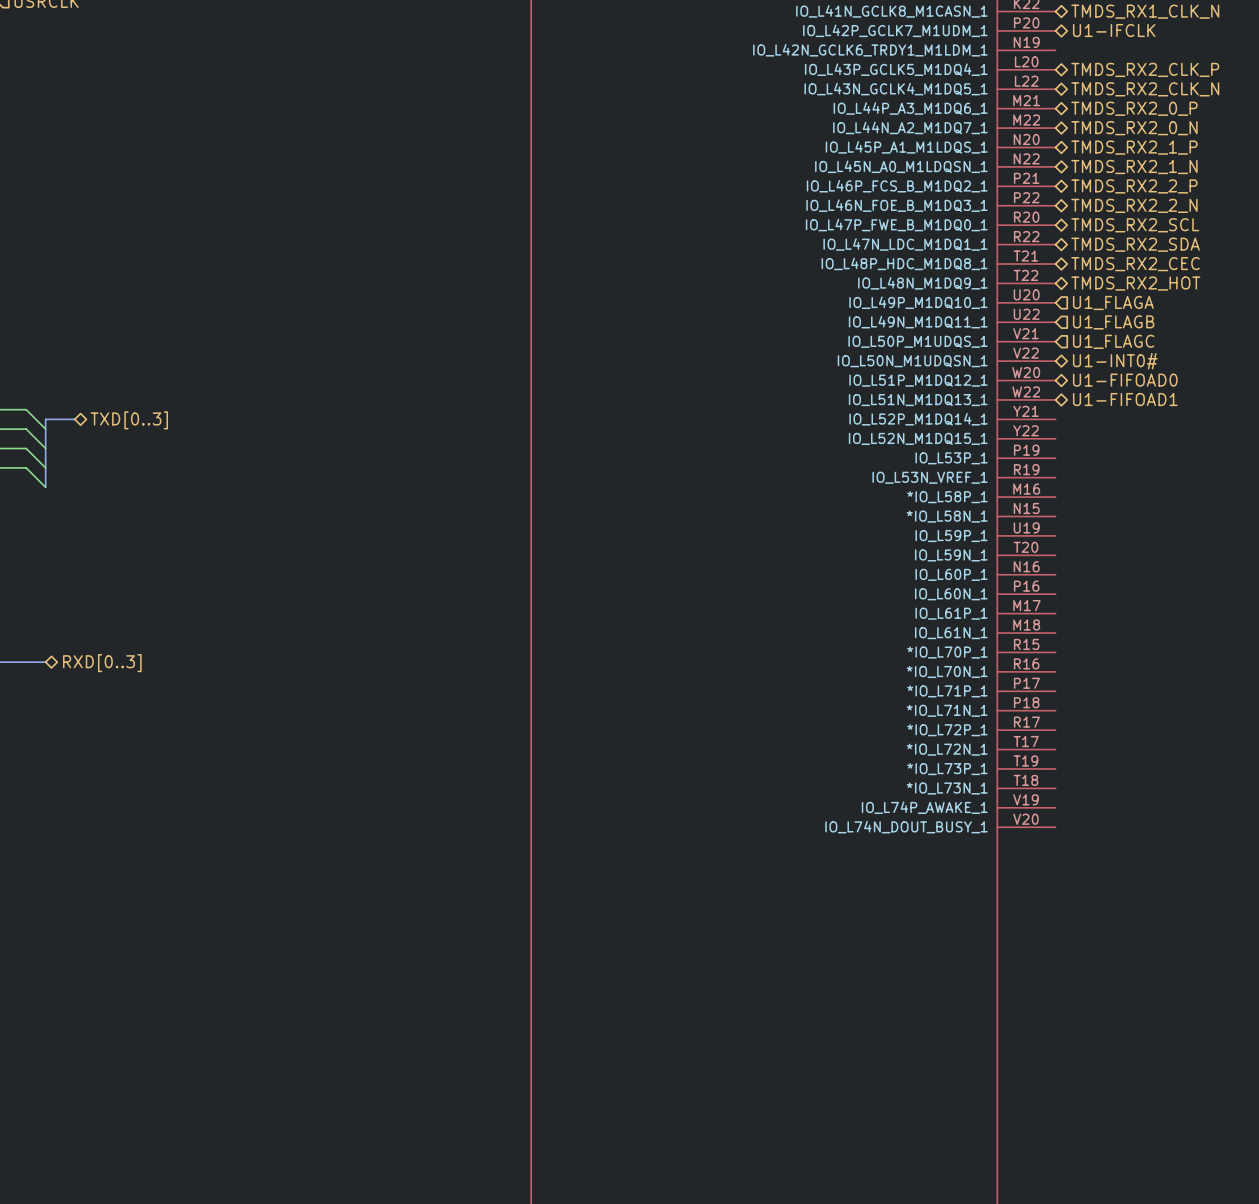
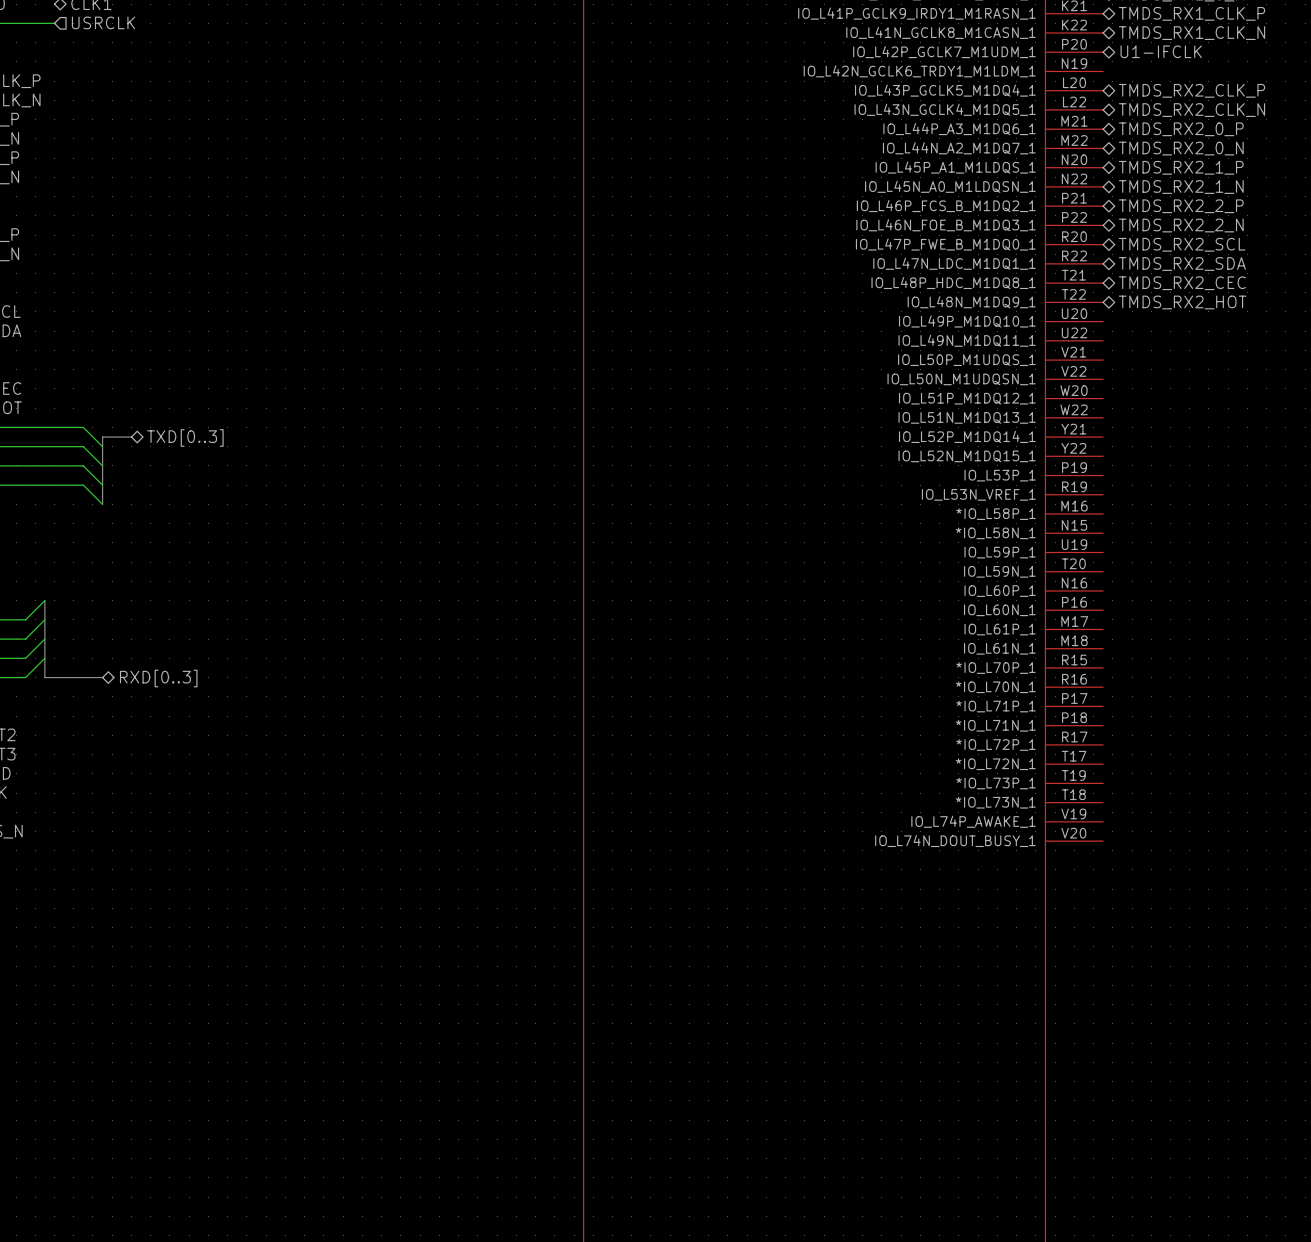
hierarchical label: U1_FLAGA (1113, 302) -> none
hierarchical label: U1_FLAGB (1113, 322) -> none
hierarchical label: U1_FLAGC (1113, 341) -> none
hierarchical label: U1-INT0# (1115, 361) -> none
hierarchical label: U1-FIFOAD0 (1125, 380) -> none
hierarchical label: U1-FIFOAD1 (1125, 399) -> none

